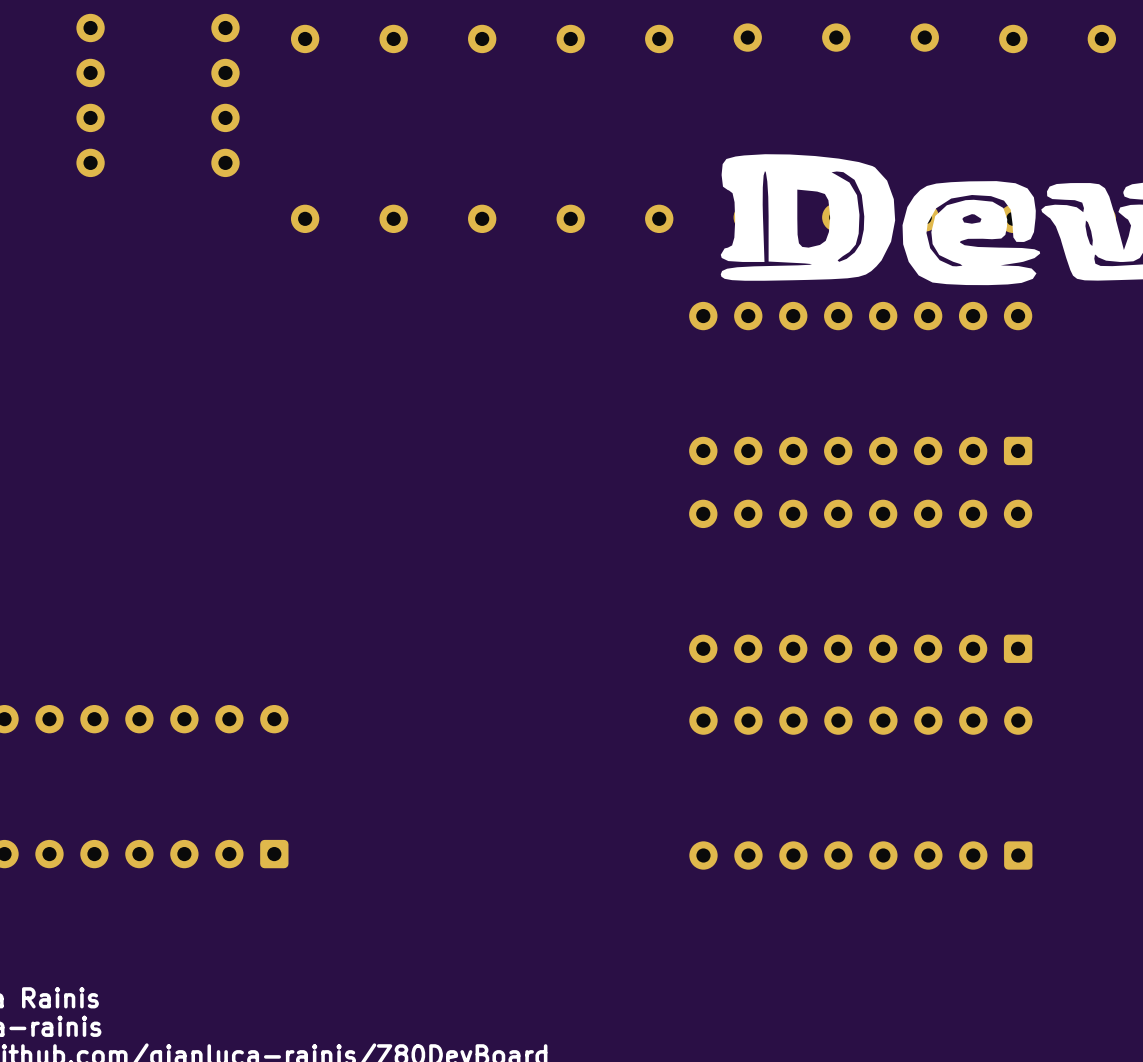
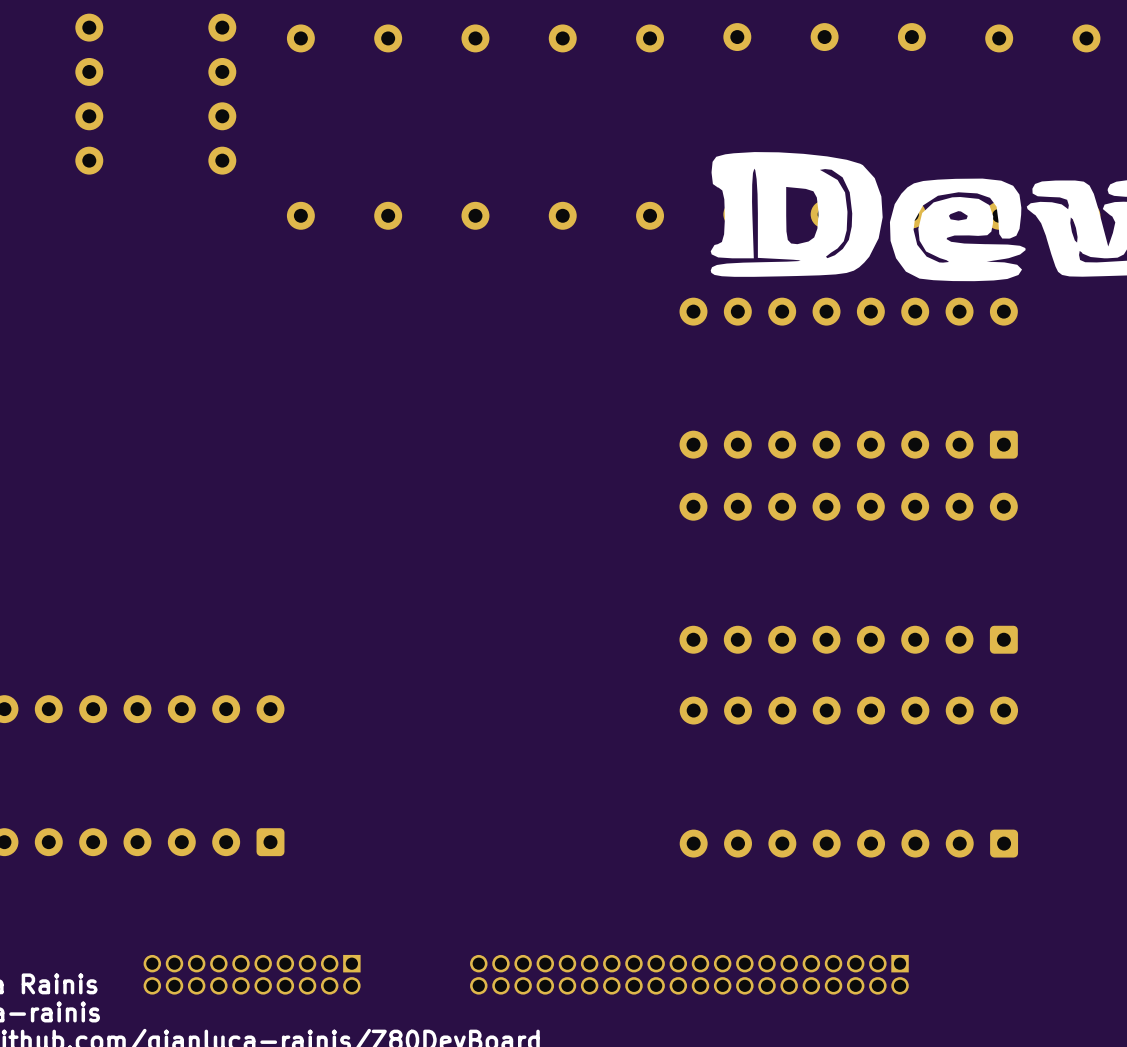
part: none -> (252, 974)
part: none -> (689, 974)

